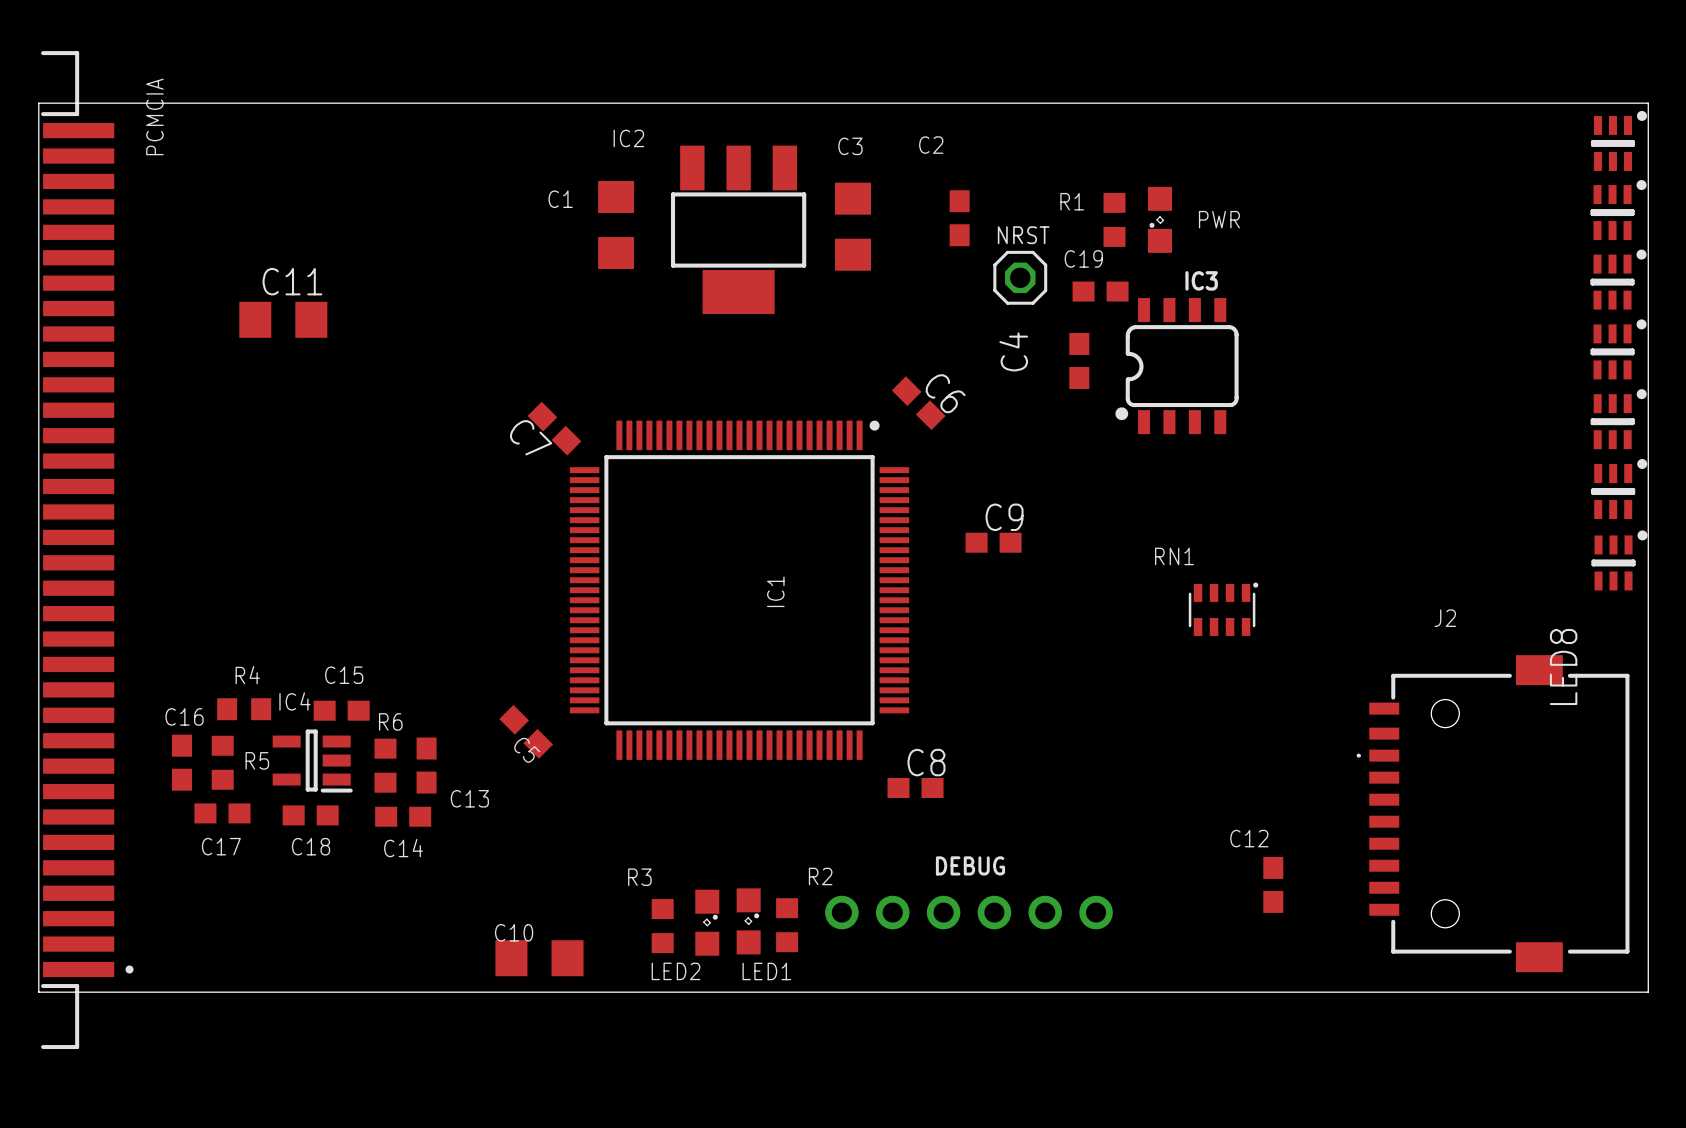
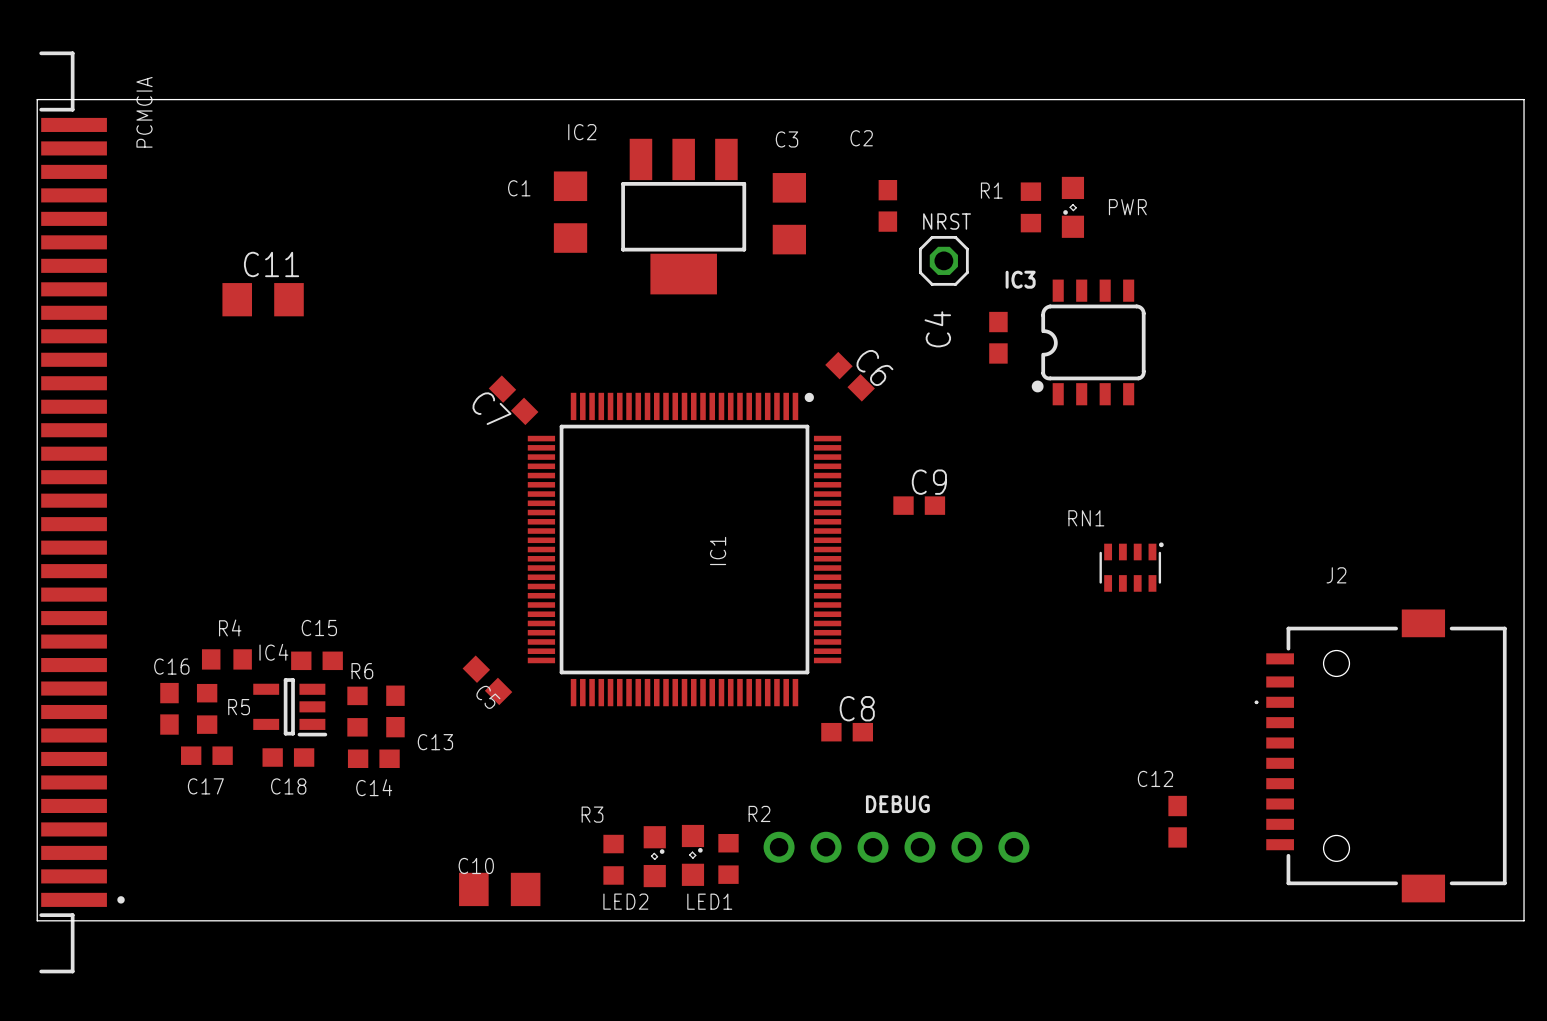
part: (1618, 140) -> none
part: (1618, 210) -> none
part: (1618, 279) -> none
IC3 name position: IC3 (1201, 280) -> IC3 (1020, 279)
C19: (1100, 291) -> none
part: (1618, 349) -> none
part: (1618, 419) -> none
LED8: (1619, 489) -> none
part: (1619, 560) -> none

